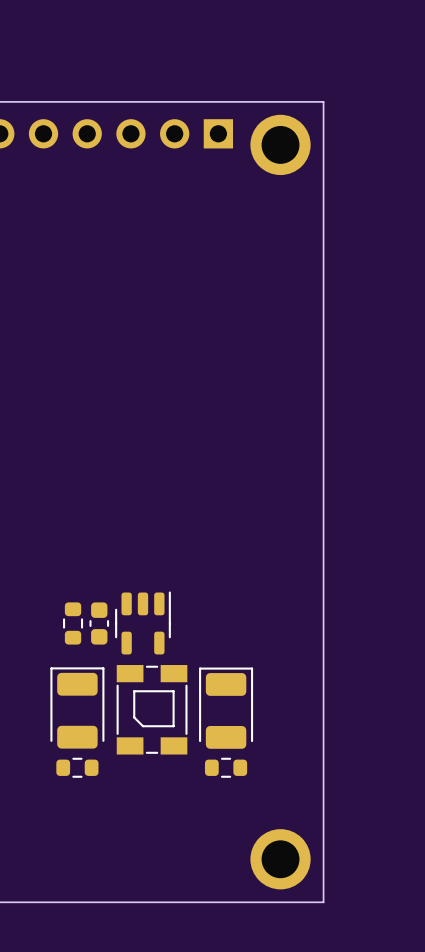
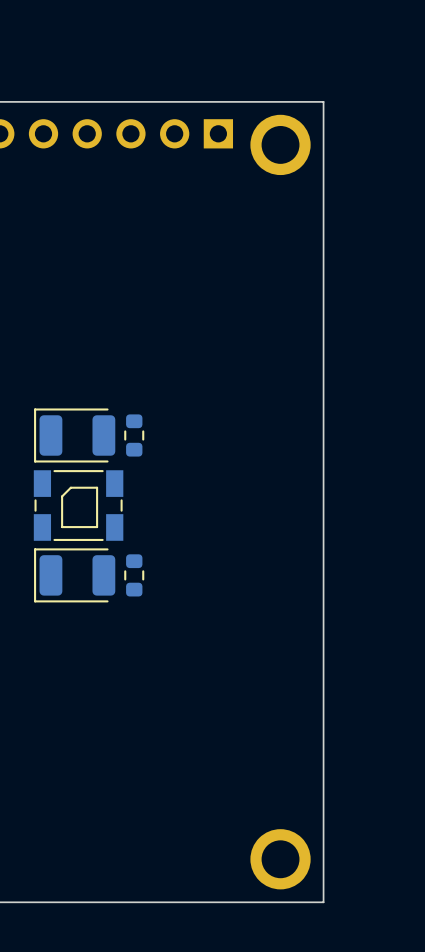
part: none -> (74, 435)
part: none -> (134, 435)
part: none -> (74, 575)
part: (142, 622) -> none
part position: (73, 623) -> (134, 575)
part: (99, 623) -> none
part: (77, 707) -> none
part: (226, 708) -> none
part rotation: 0° (152, 709) -> 90° clockwise (78, 505)
part position: (152, 709) -> (78, 505)
part: (77, 767) -> none
part: (226, 767) -> none

